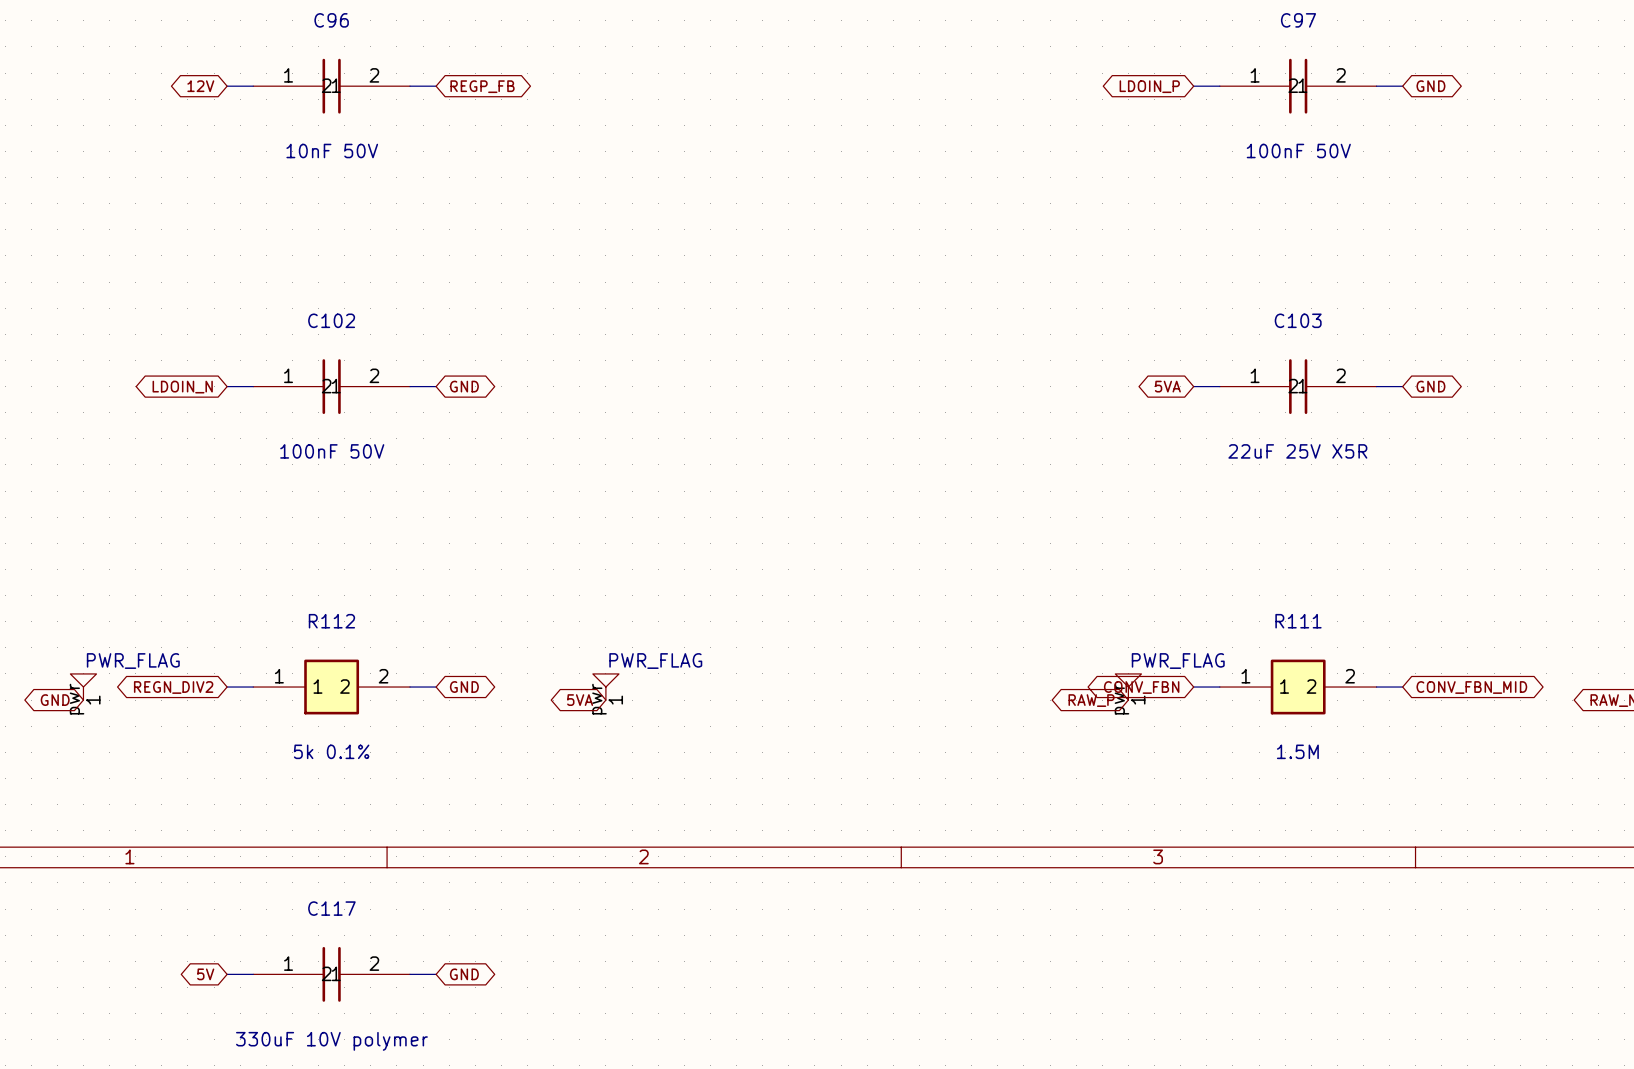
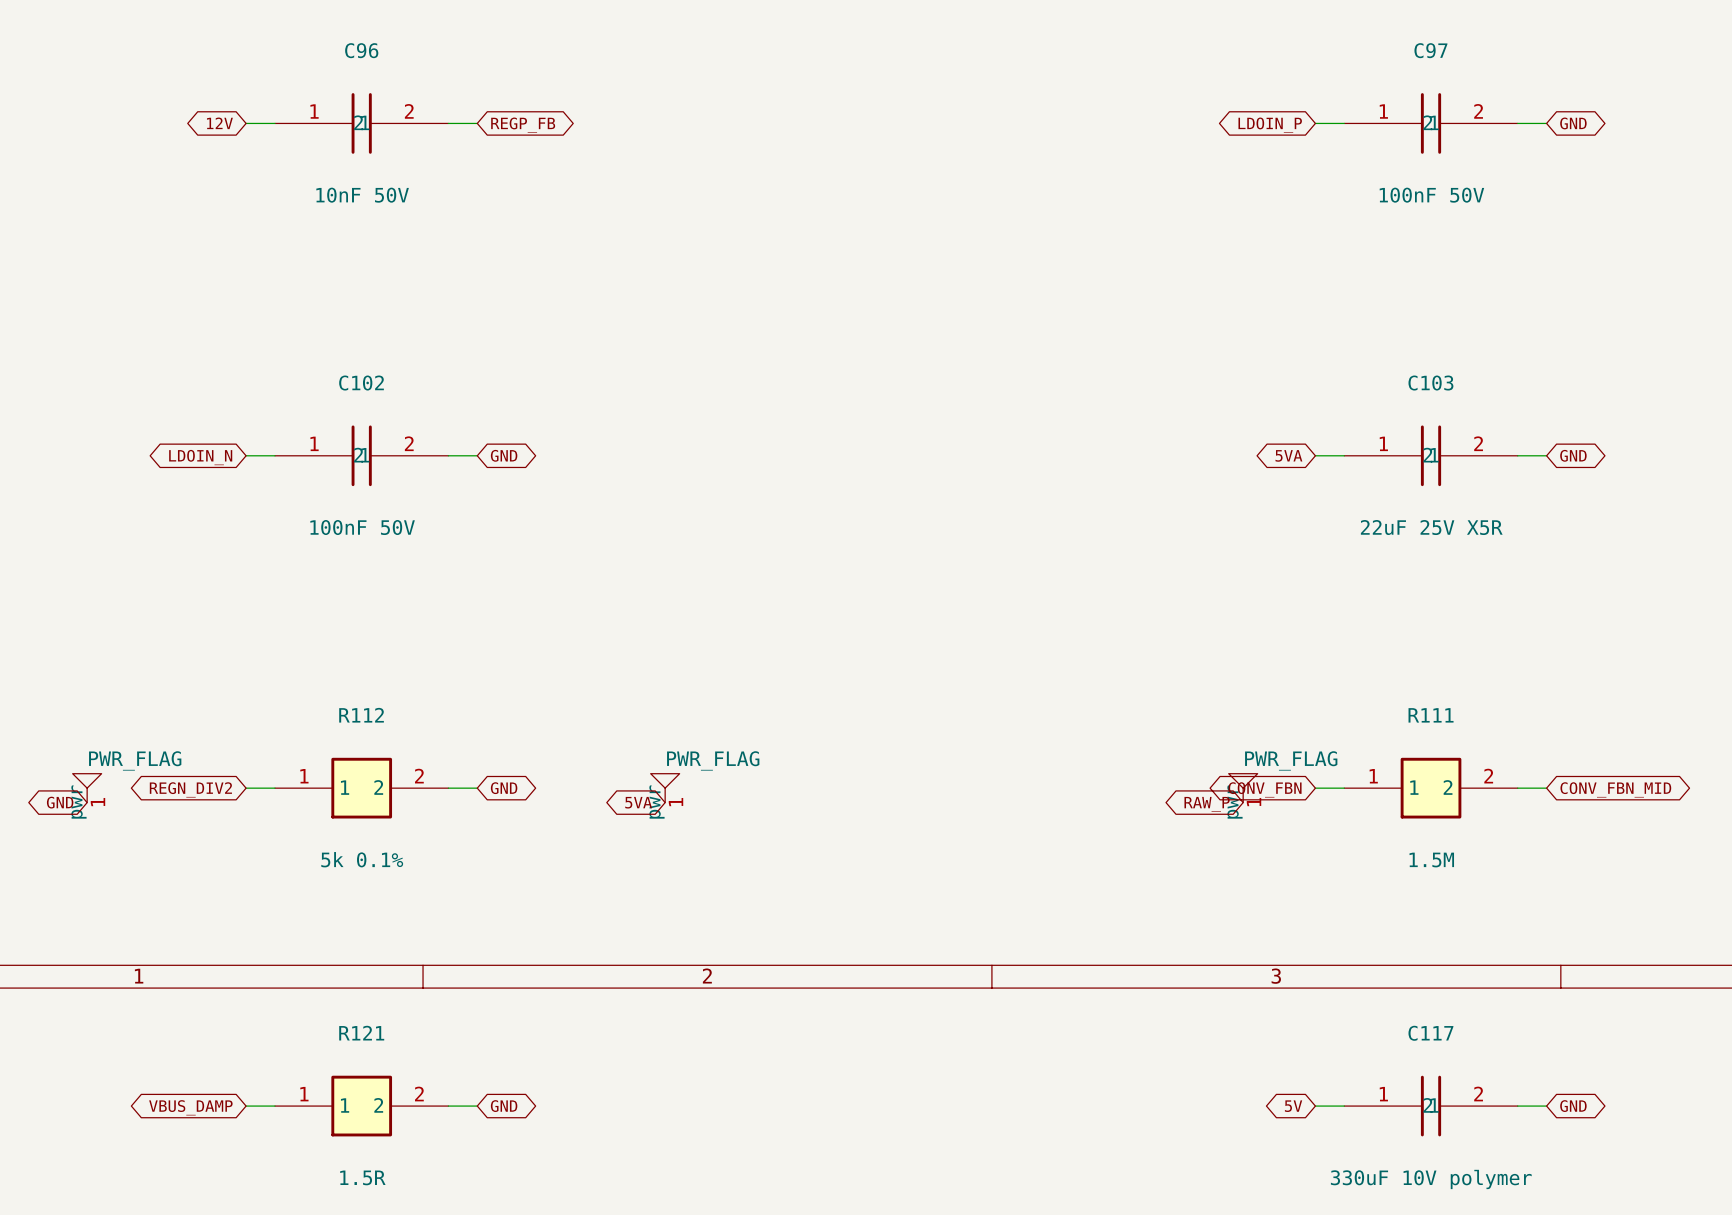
global label: 5V (205, 974) -> VBUS_DAMP (190, 1107)
C117 position: (331, 974) -> (1431, 1106)
R121: none -> 1.5R (361, 1106)
global label: none -> 5V (1293, 1106)
wire: none -> (1315, 1106) (1344, 1106)
wire: none -> (1517, 1106) (1546, 1106)
global label: none -> GND (1573, 1106)

